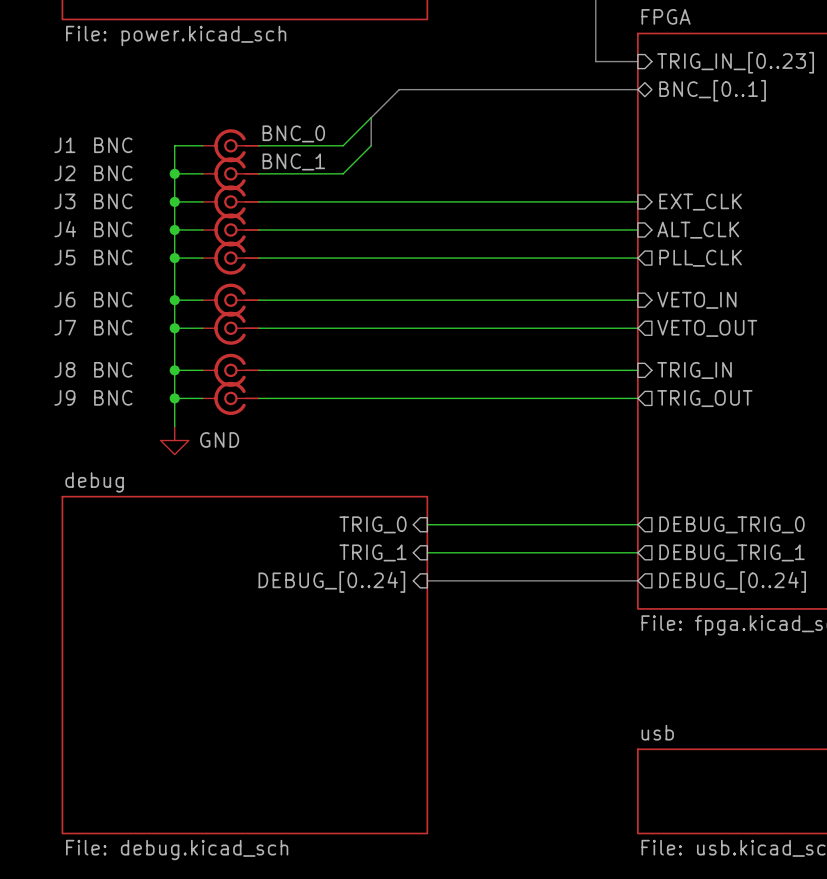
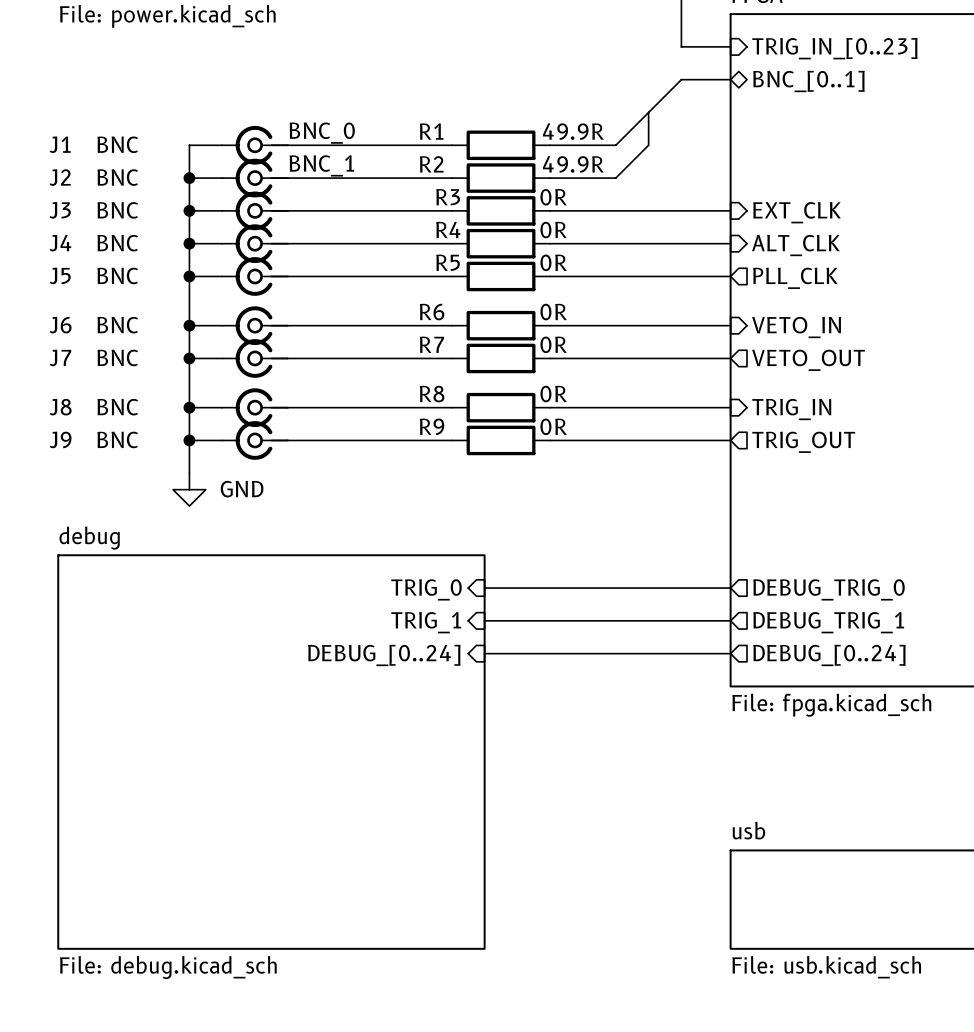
bus: (595, 89) (399, 89) (371, 117) (371, 145) -> (681, 79) (648, 112) (648, 145)
wire: (371, 117) (343, 145) -> (451, 145) (386, 145)
wire: none -> (648, 112) (615, 145) (550, 145)
wire: (371, 145) (343, 173) -> (451, 178) (386, 178)
R1: none -> 49.9R (501, 145)
wire: none -> (648, 145) (615, 178) (550, 178)
R2: none -> 49.9R (501, 178)
wire: (399, 201) (483, 201) -> none
R3: none -> 0R (501, 210)
wire: (399, 229) (483, 229) -> none
R4: none -> 0R (501, 243)
wire: (399, 258) (483, 258) -> none
R5: none -> 0R (501, 276)
wire: (399, 300) (483, 300) -> none
R6: none -> 0R (501, 325)
wire: (399, 328) (483, 328) -> none
R7: none -> 0R (501, 358)
wire: (399, 370) (483, 370) -> none
R8: none -> 0R (501, 407)
wire: (399, 398) (483, 398) -> none
R9: none -> 0R (501, 440)

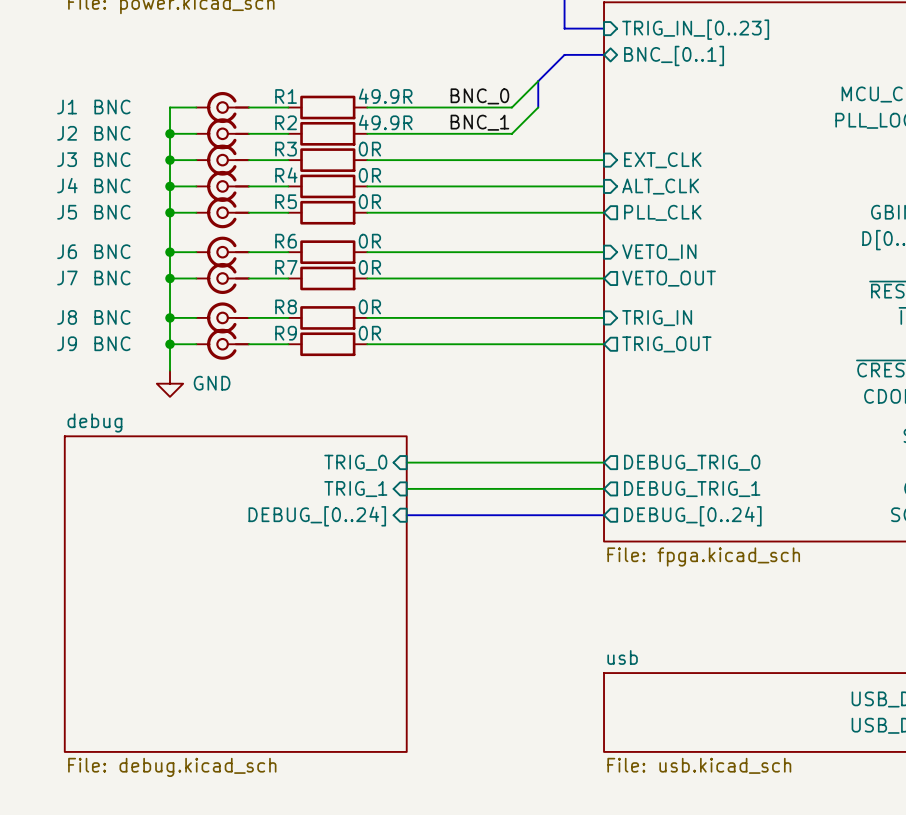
R1 name position: R1 (431, 131) -> R1 (286, 96)
label: BNC_0 (322, 133) -> none
label: none -> BNC_0 (479, 96)
wire: (337, 145) (435, 145) -> (380, 107) (459, 107)
R1 position: (501, 145) -> (327, 107)
R2 name position: R2 (431, 164) -> R2 (286, 122)
label: BNC_1 (321, 165) -> none
label: none -> BNC_1 (479, 122)
wire: (337, 178) (435, 178) -> (380, 133) (459, 133)
R2 position: (501, 178) -> (327, 133)
wire: (337, 210) (435, 210) -> (380, 160) (459, 160)
R3 position: (501, 210) -> (327, 160)
wire: (337, 243) (435, 243) -> (380, 186) (459, 186)
R4 position: (501, 243) -> (327, 186)
wire: (337, 276) (435, 276) -> (380, 212) (459, 212)
R5 position: (501, 276) -> (327, 212)
R6 name position: R6 (432, 312) -> R6 (286, 241)
wire: (337, 325) (435, 325) -> (380, 252) (459, 252)
R6 position: (501, 325) -> (327, 252)
R7 name position: R7 (431, 344) -> R7 (286, 267)
wire: (337, 358) (435, 358) -> (380, 278) (459, 278)
R7 position: (501, 358) -> (327, 278)
R8 name position: R8 (432, 394) -> R8 (286, 306)
wire: (337, 407) (435, 407) -> (380, 317) (459, 317)
R8 position: (501, 407) -> (327, 317)
R9 name position: R9 (432, 426) -> R9 (286, 333)
wire: (337, 440) (435, 440) -> (380, 344) (459, 344)
R9 position: (501, 440) -> (327, 344)

